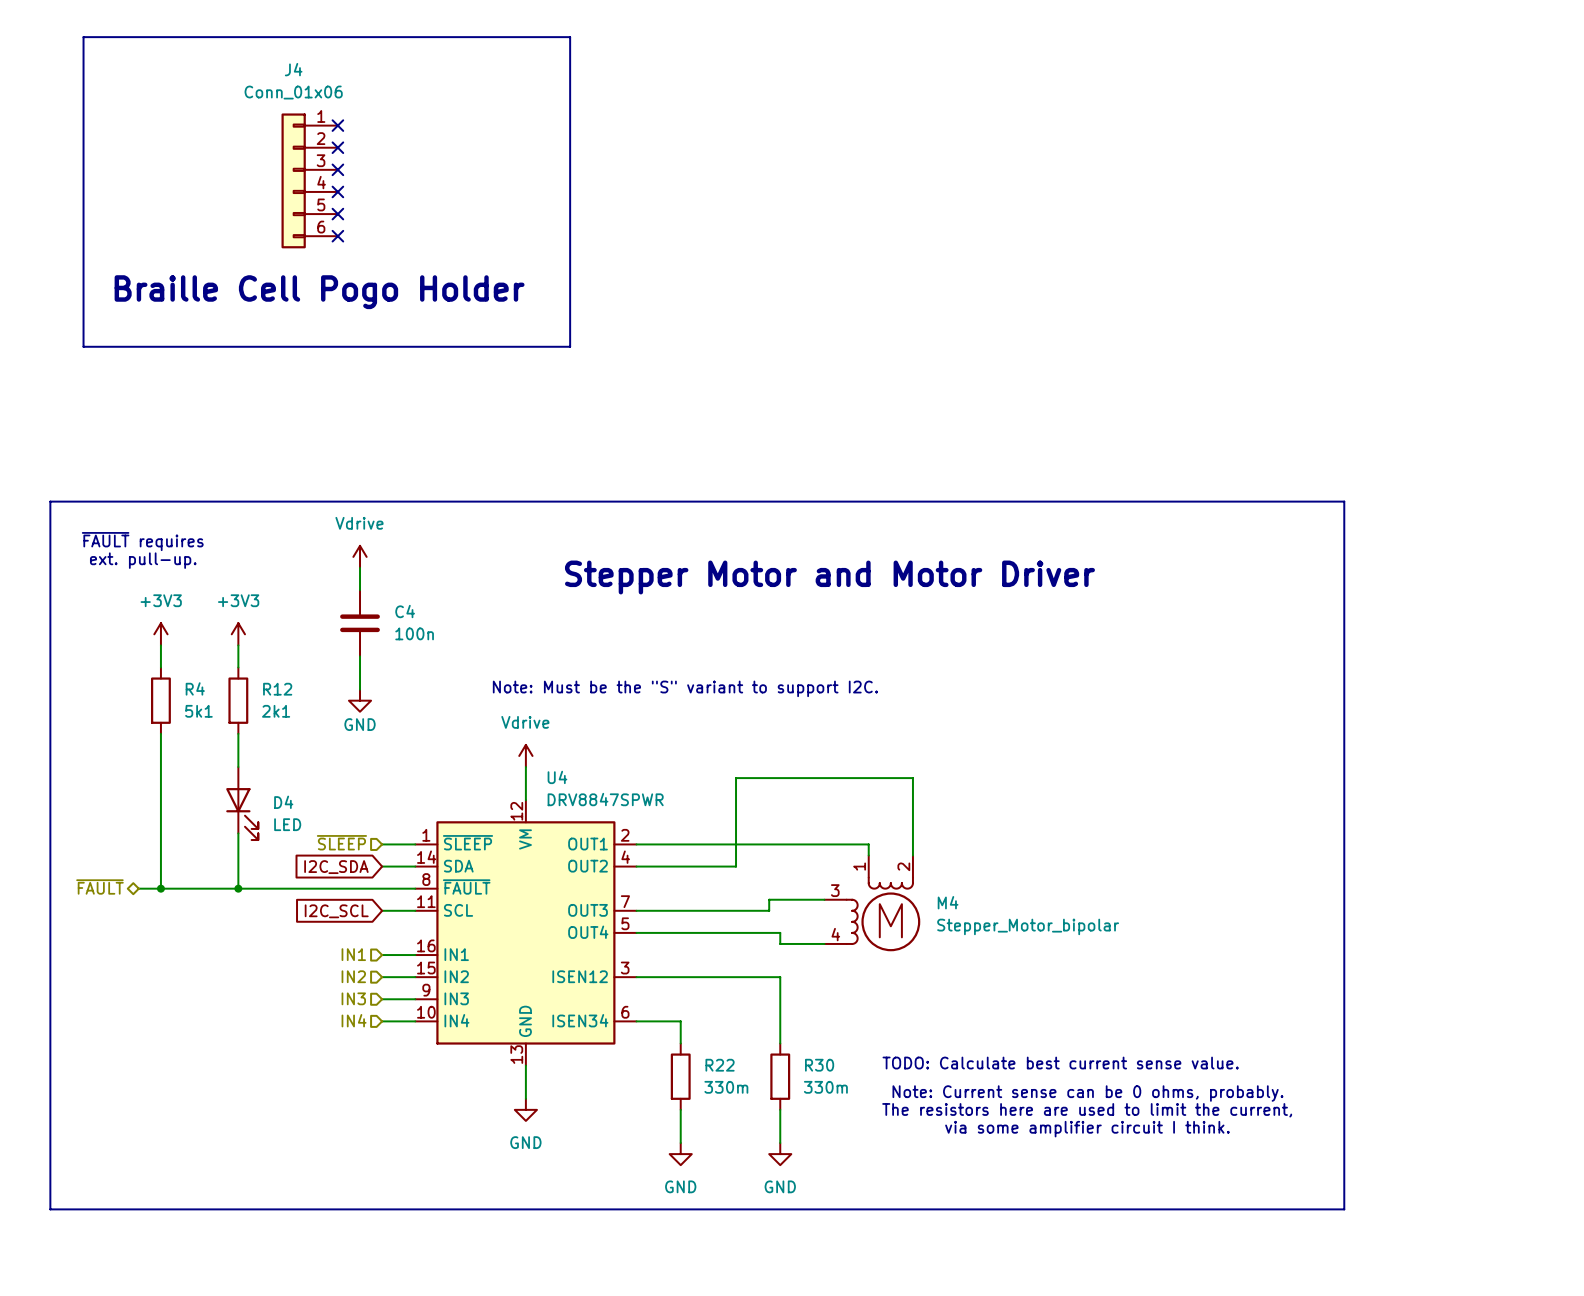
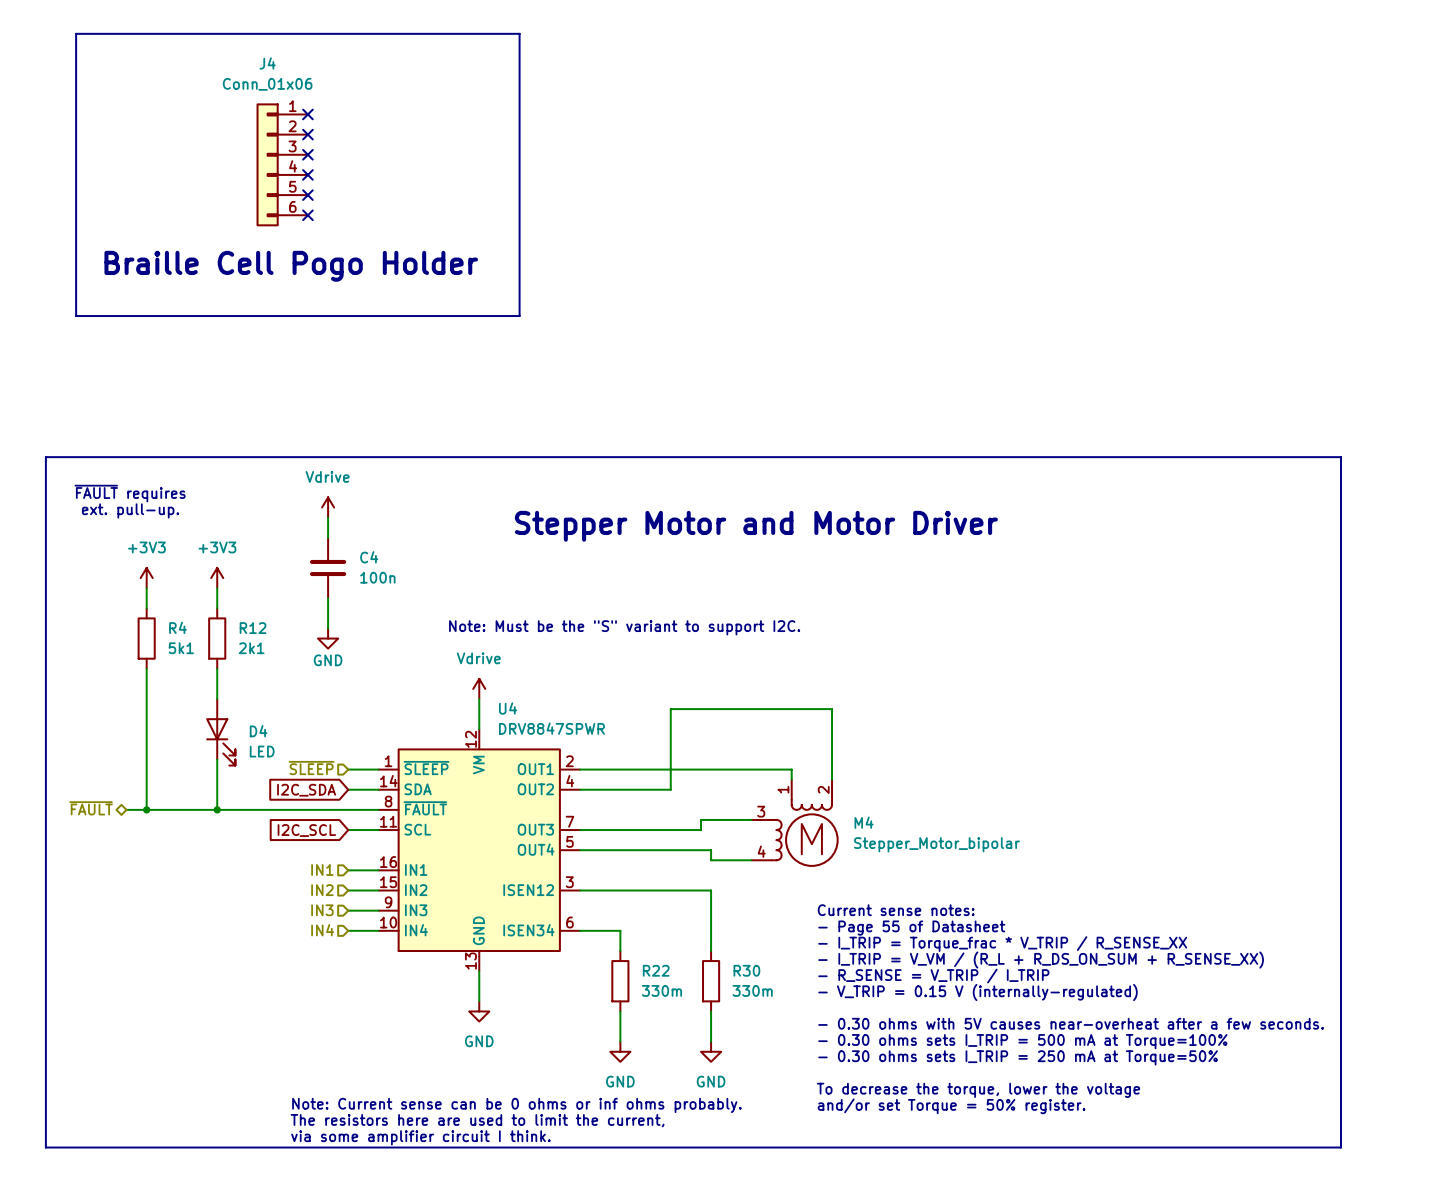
line: (1344, 501) (1344, 1209) (50, 1209) -> (1225, 457) (1340, 457) (1340, 1147) (45, 1147) (45, 1102)
text: none -> Current sense notes: (896, 910)
text: none -> - Page 55 of Datasheet (911, 928)
text: none -> - I_TRIP = Torque_frac * V_TRIP / R_SENSE_XX (1002, 944)
text: none -> - I_TRIP = V_VM / (R_L + R_DS_ON_SUM + R_SENSE_XX) (1041, 960)
text: TODO: Calculate best current sense value. (1060, 1063) -> none
text: none -> - R_SENSE = V_TRIP / I_TRIP (933, 976)
text: none -> - V_TRIP = 0.15 V (internally-regulated) (977, 992)
text: Note: Current sense can be 0 ohms, probably. (1087, 1093) -> none
text: The resistors here are used to limit the current, (1087, 1110) -> none
text: none -> - 0.30 ohms with 5V causes near-overheat after a few seconds. (1071, 1023)
text: via some amplifier circuit I think. (1087, 1129) -> none
text: none -> - 0.30 ohms sets I_TRIP = 500 mA at Torque=100% (1022, 1041)
text: none -> - 0.30 ohms sets I_TRIP = 250 mA at Torque=50% (1018, 1057)
text: none -> To decrease the torque, lower the voltage (978, 1090)
text: none -> Note: Current sense can be 0 ohms or inf ohms probably. (516, 1105)
text: none -> and/or set Torque = 50% register. (951, 1106)
text: none -> The resistors here are used to limit the current, (477, 1120)
text: none -> via some amplifier circuit I think. (420, 1137)

